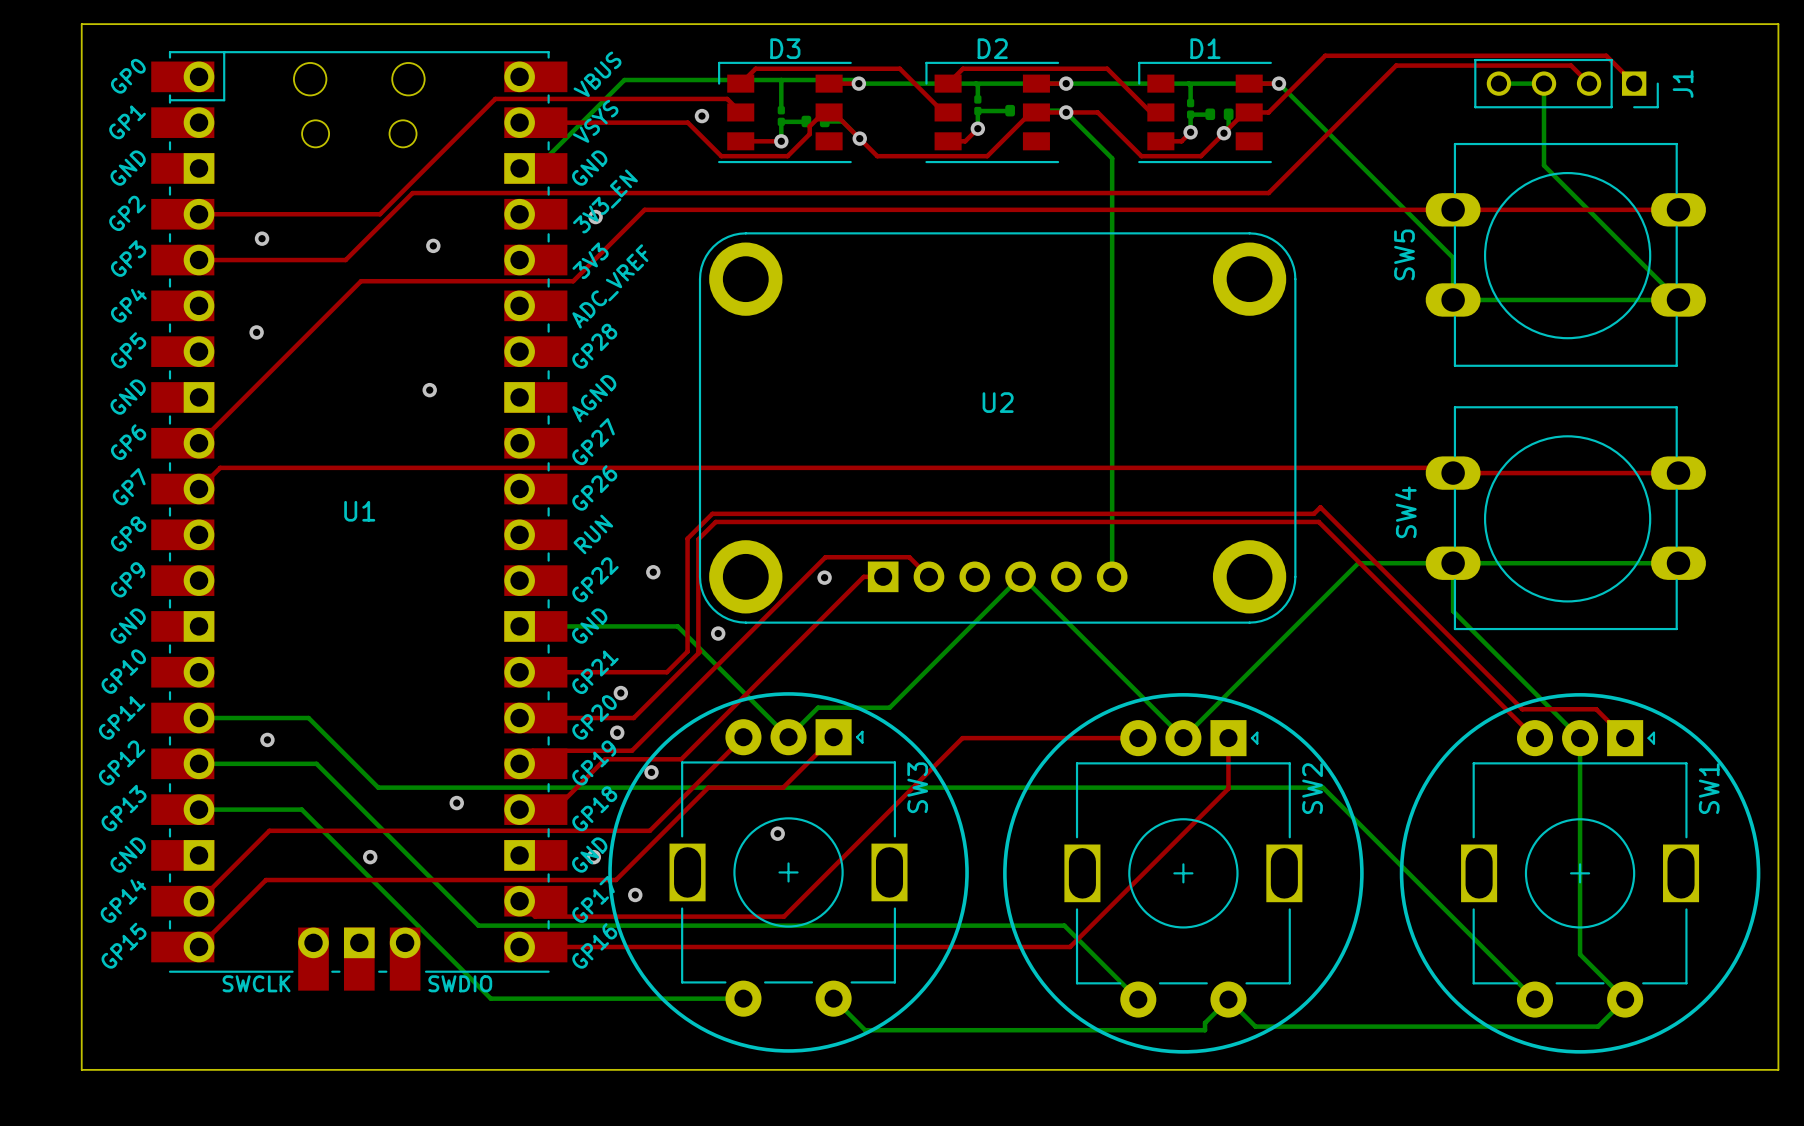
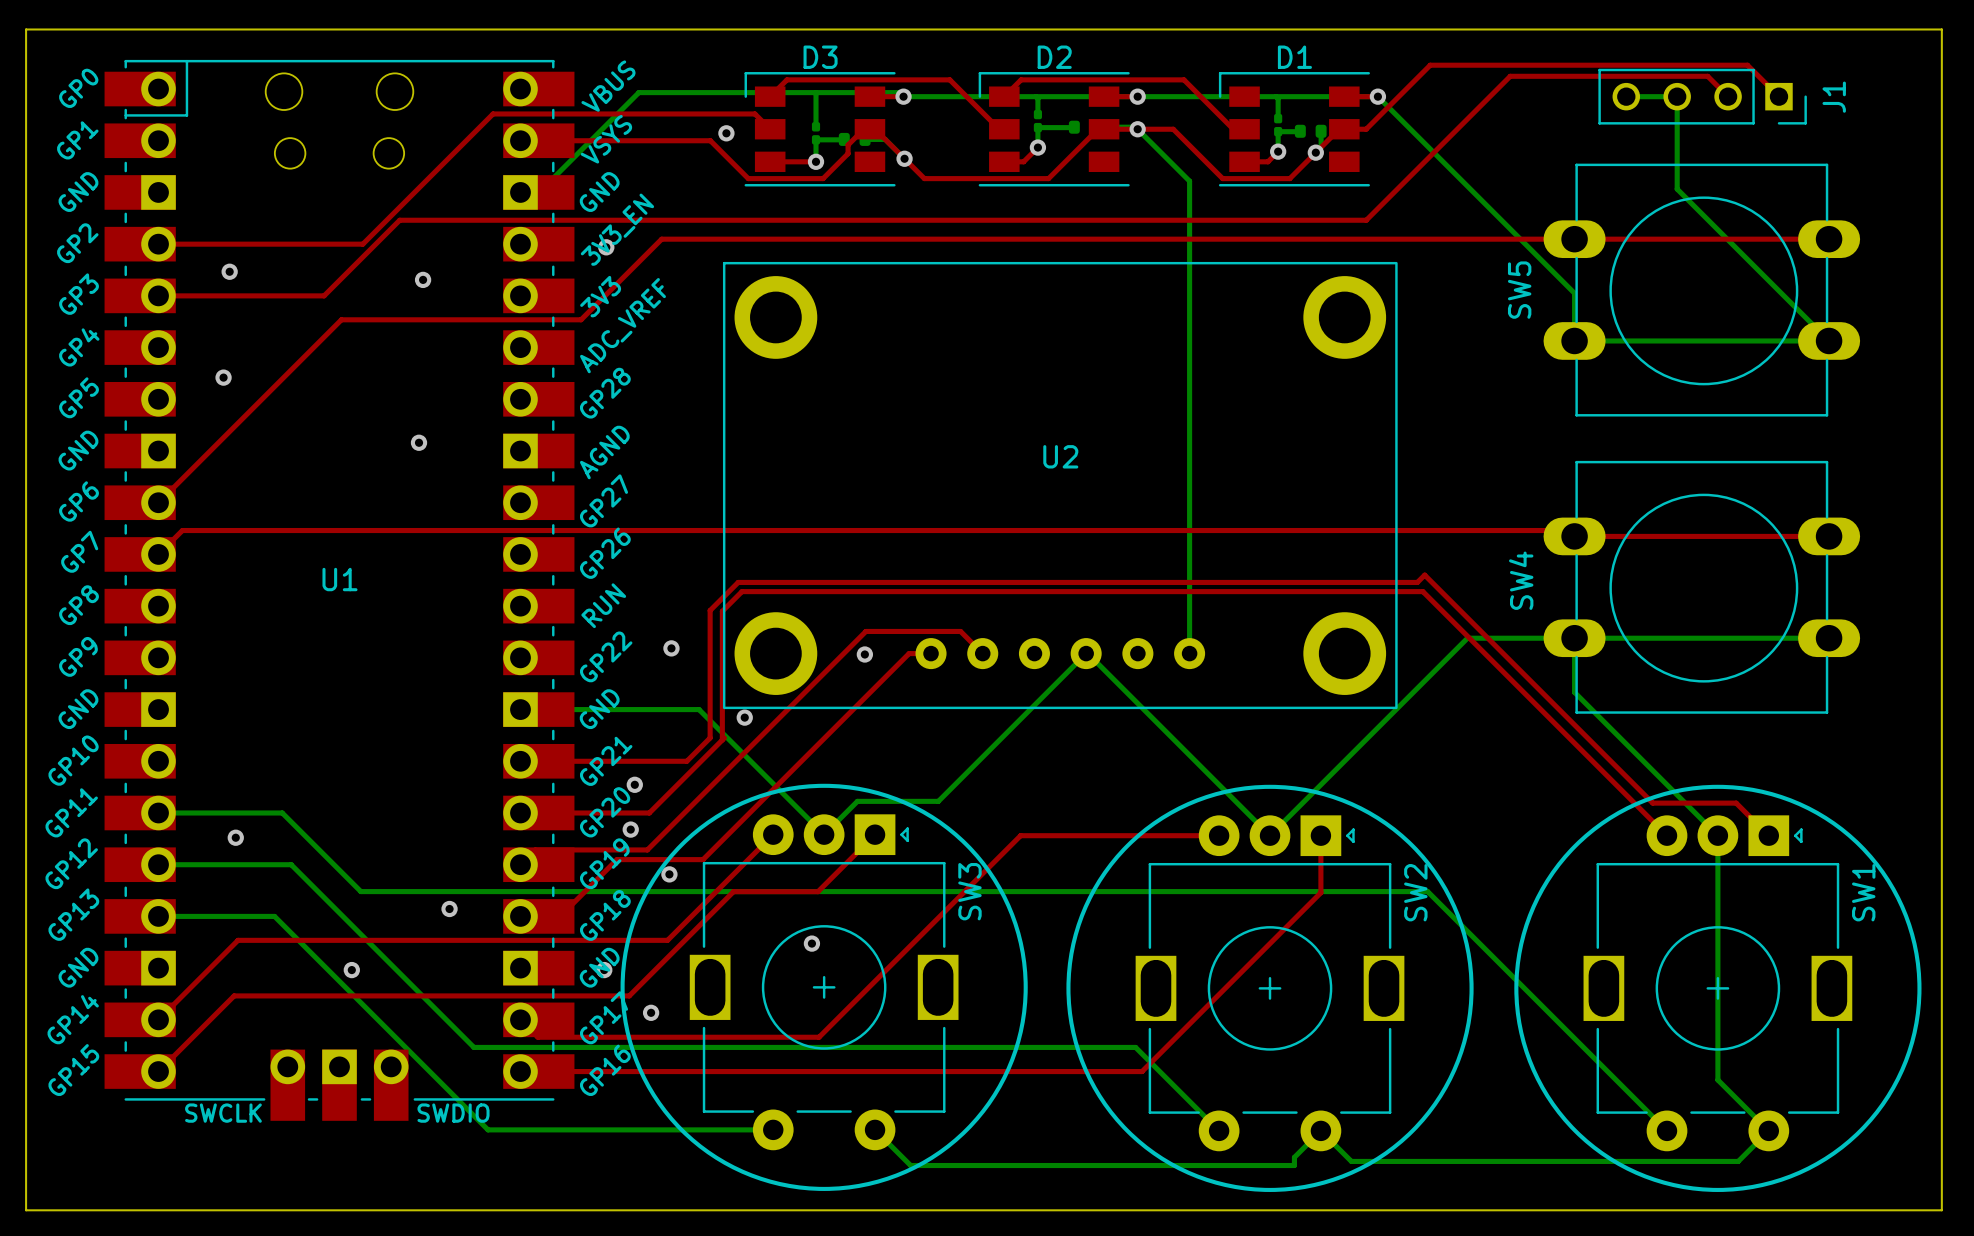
U2 footprint: [698, 232, 1297, 624] -> [722, 261, 1398, 710]

